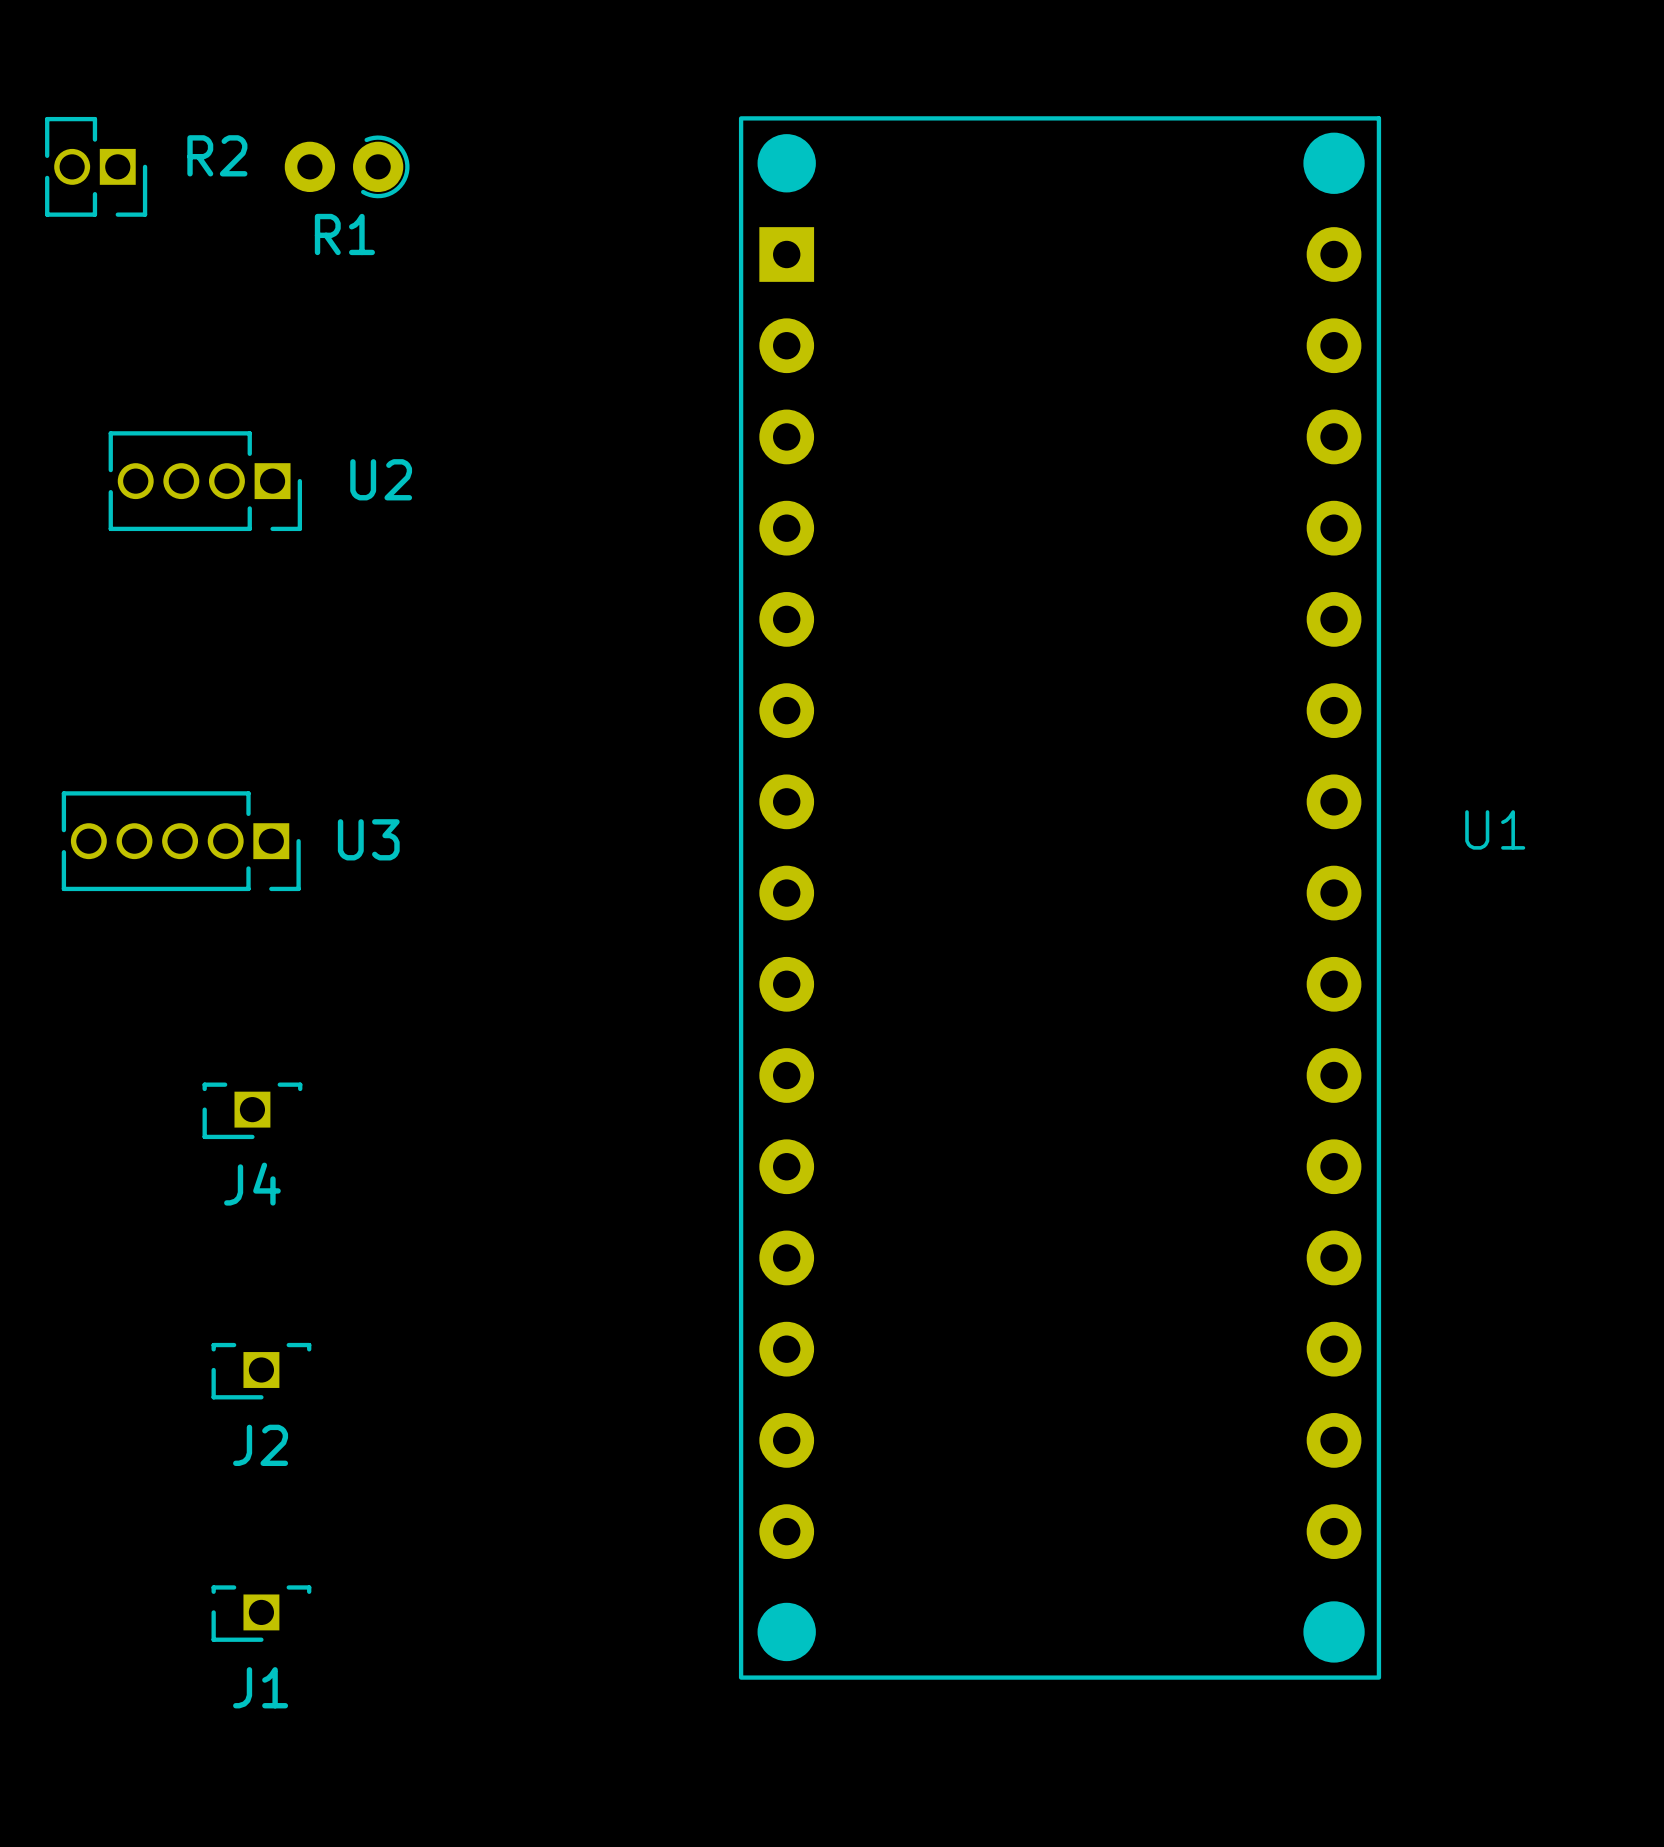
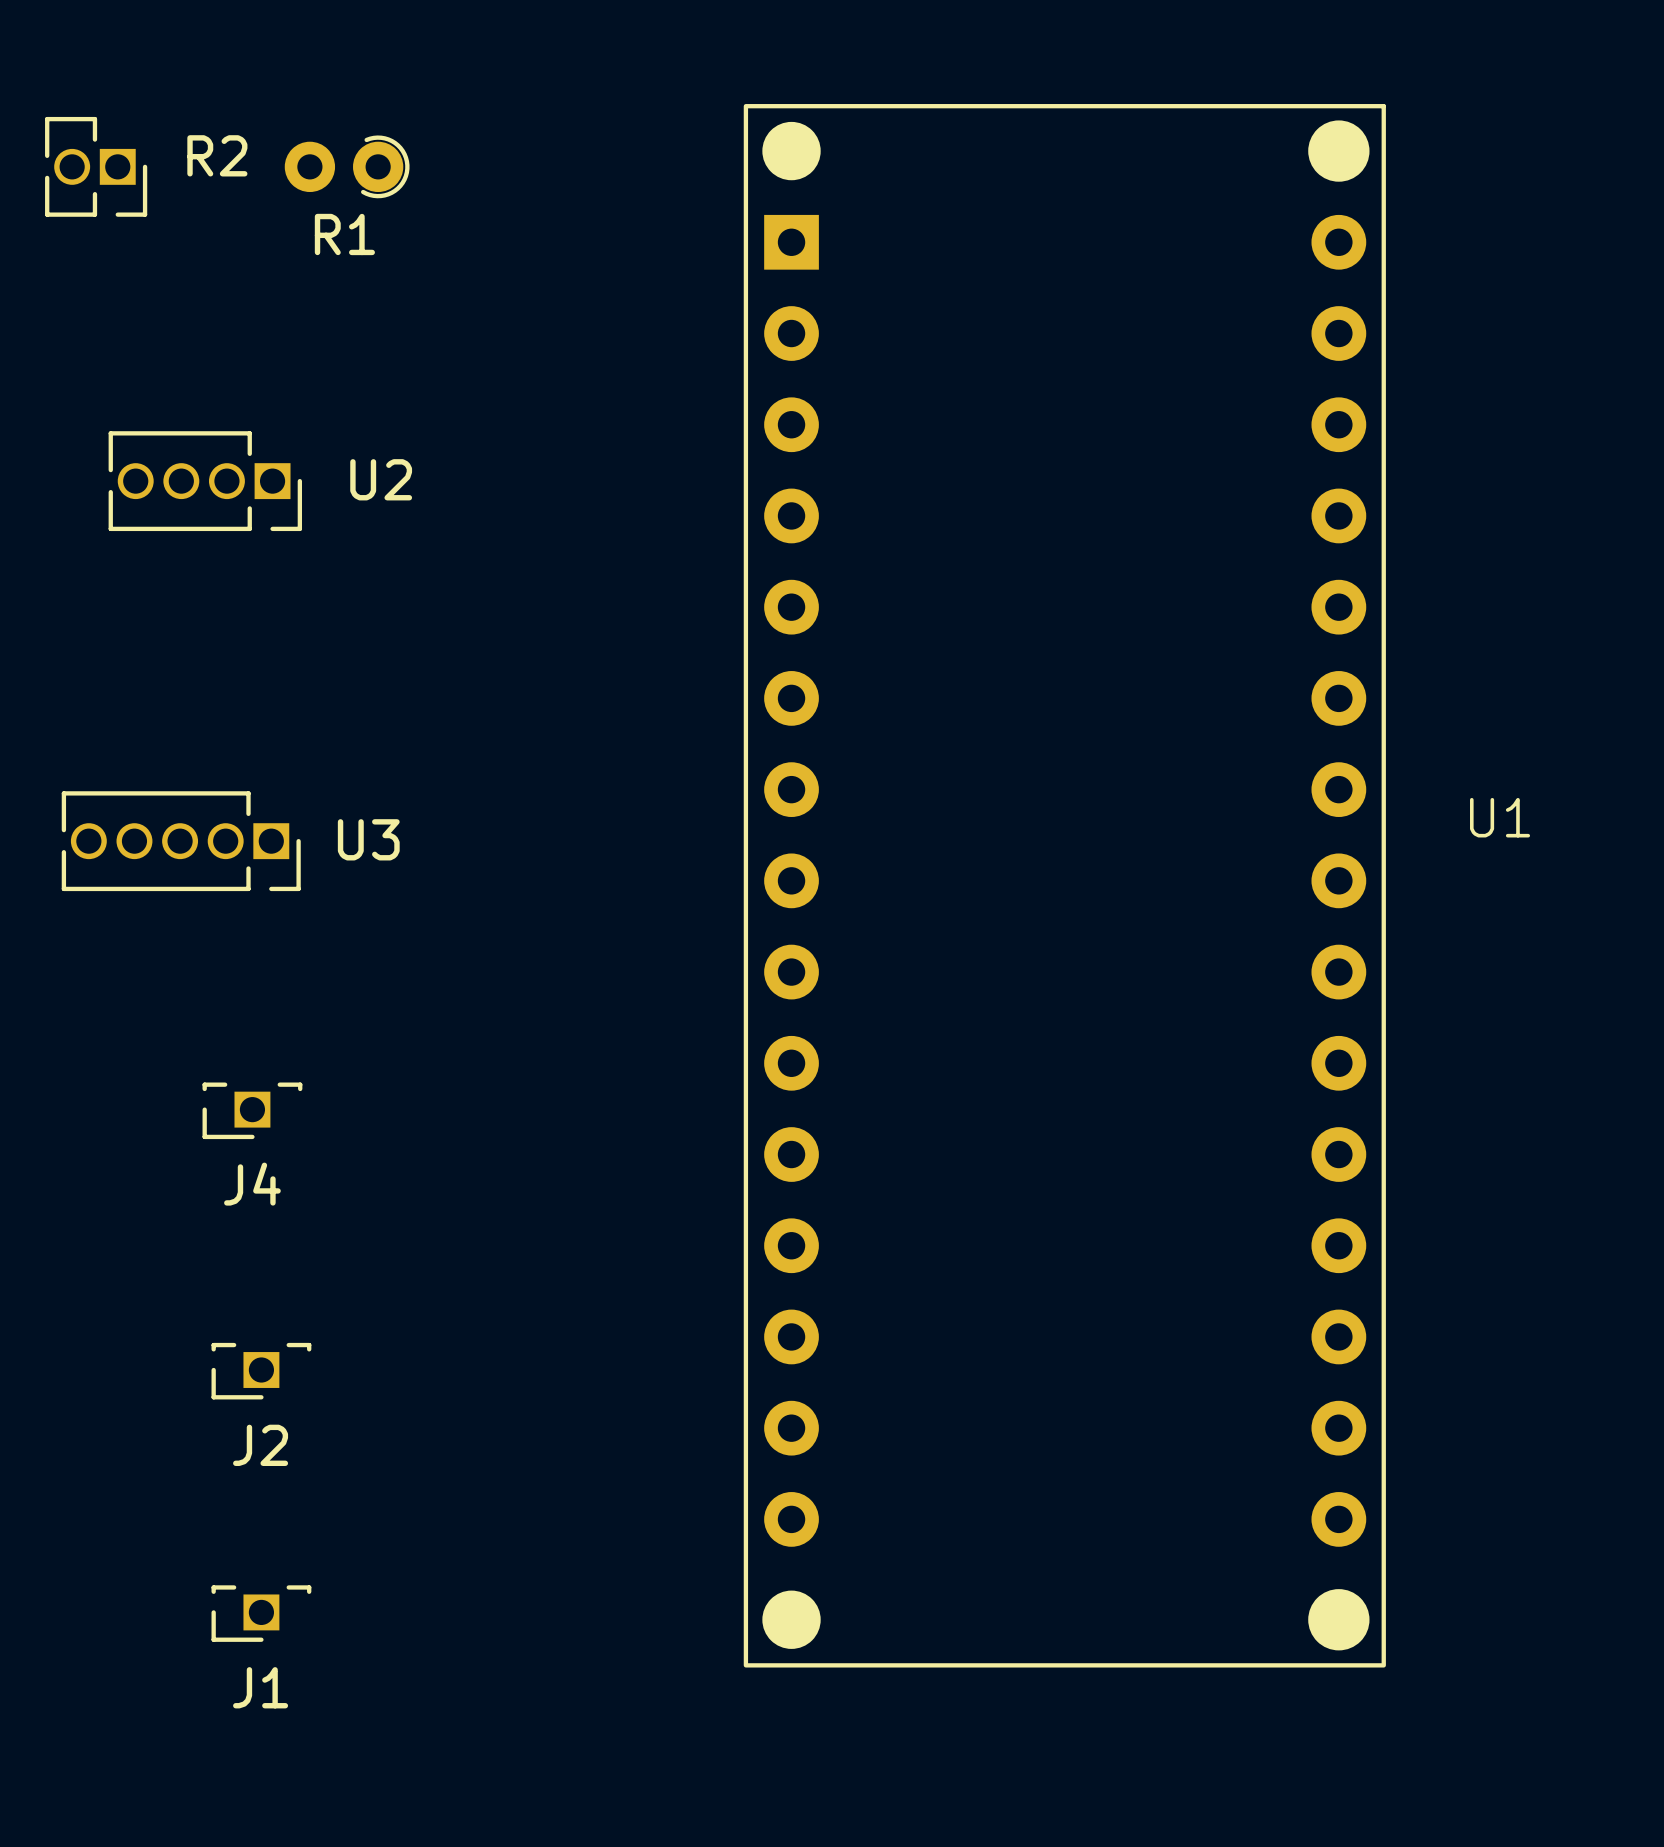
U1 position: (1060, 897) -> (1064, 885)

